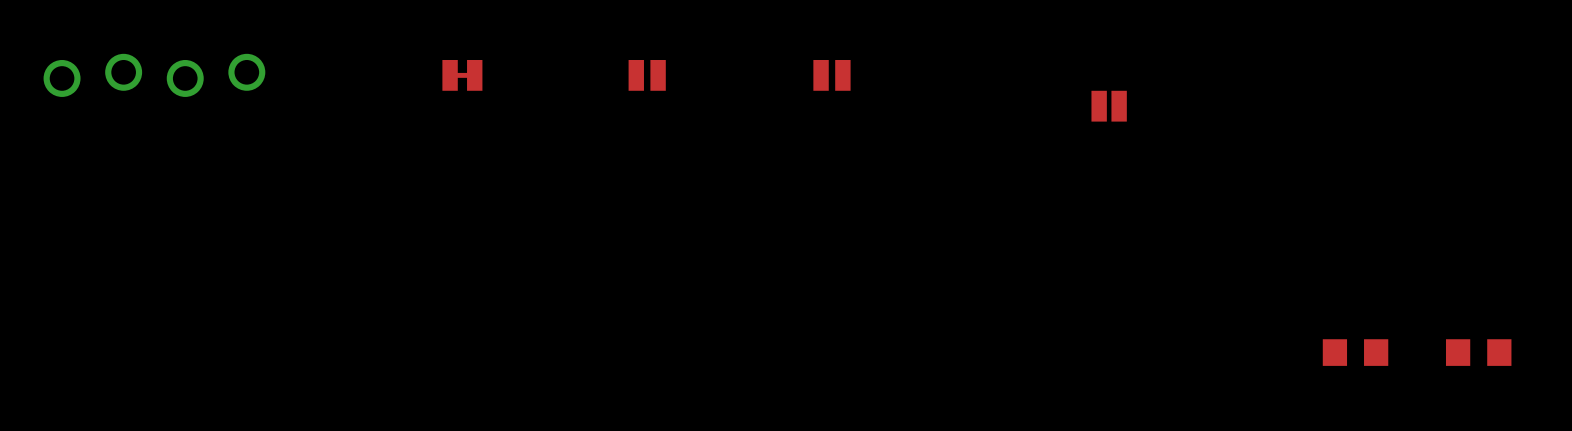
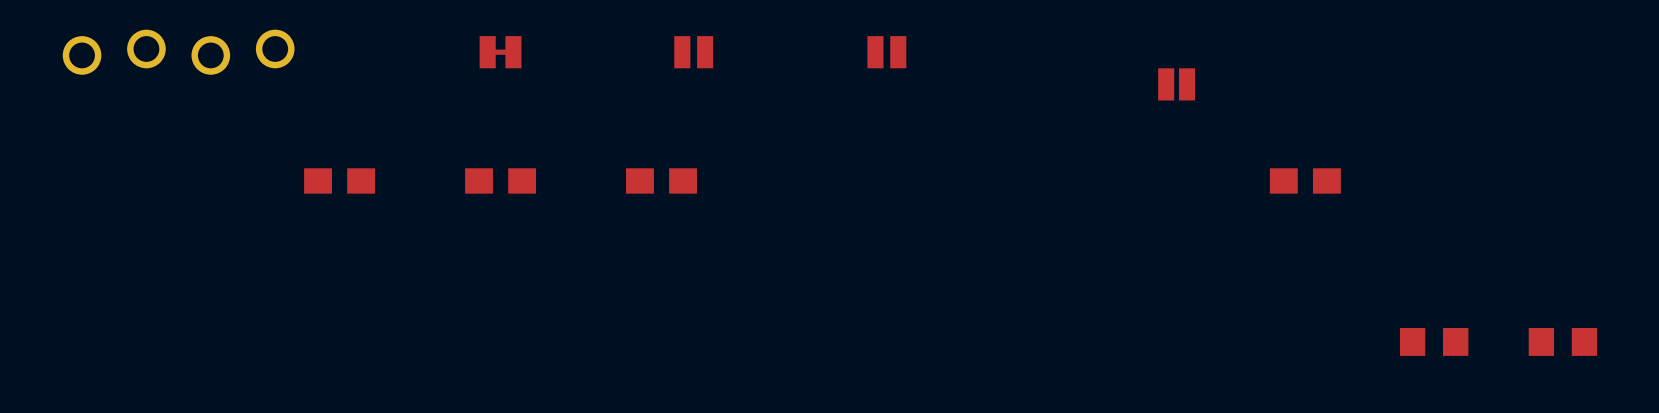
part: none -> (339, 180)
part: none -> (500, 180)
part: none -> (661, 180)
part: none -> (1305, 180)

